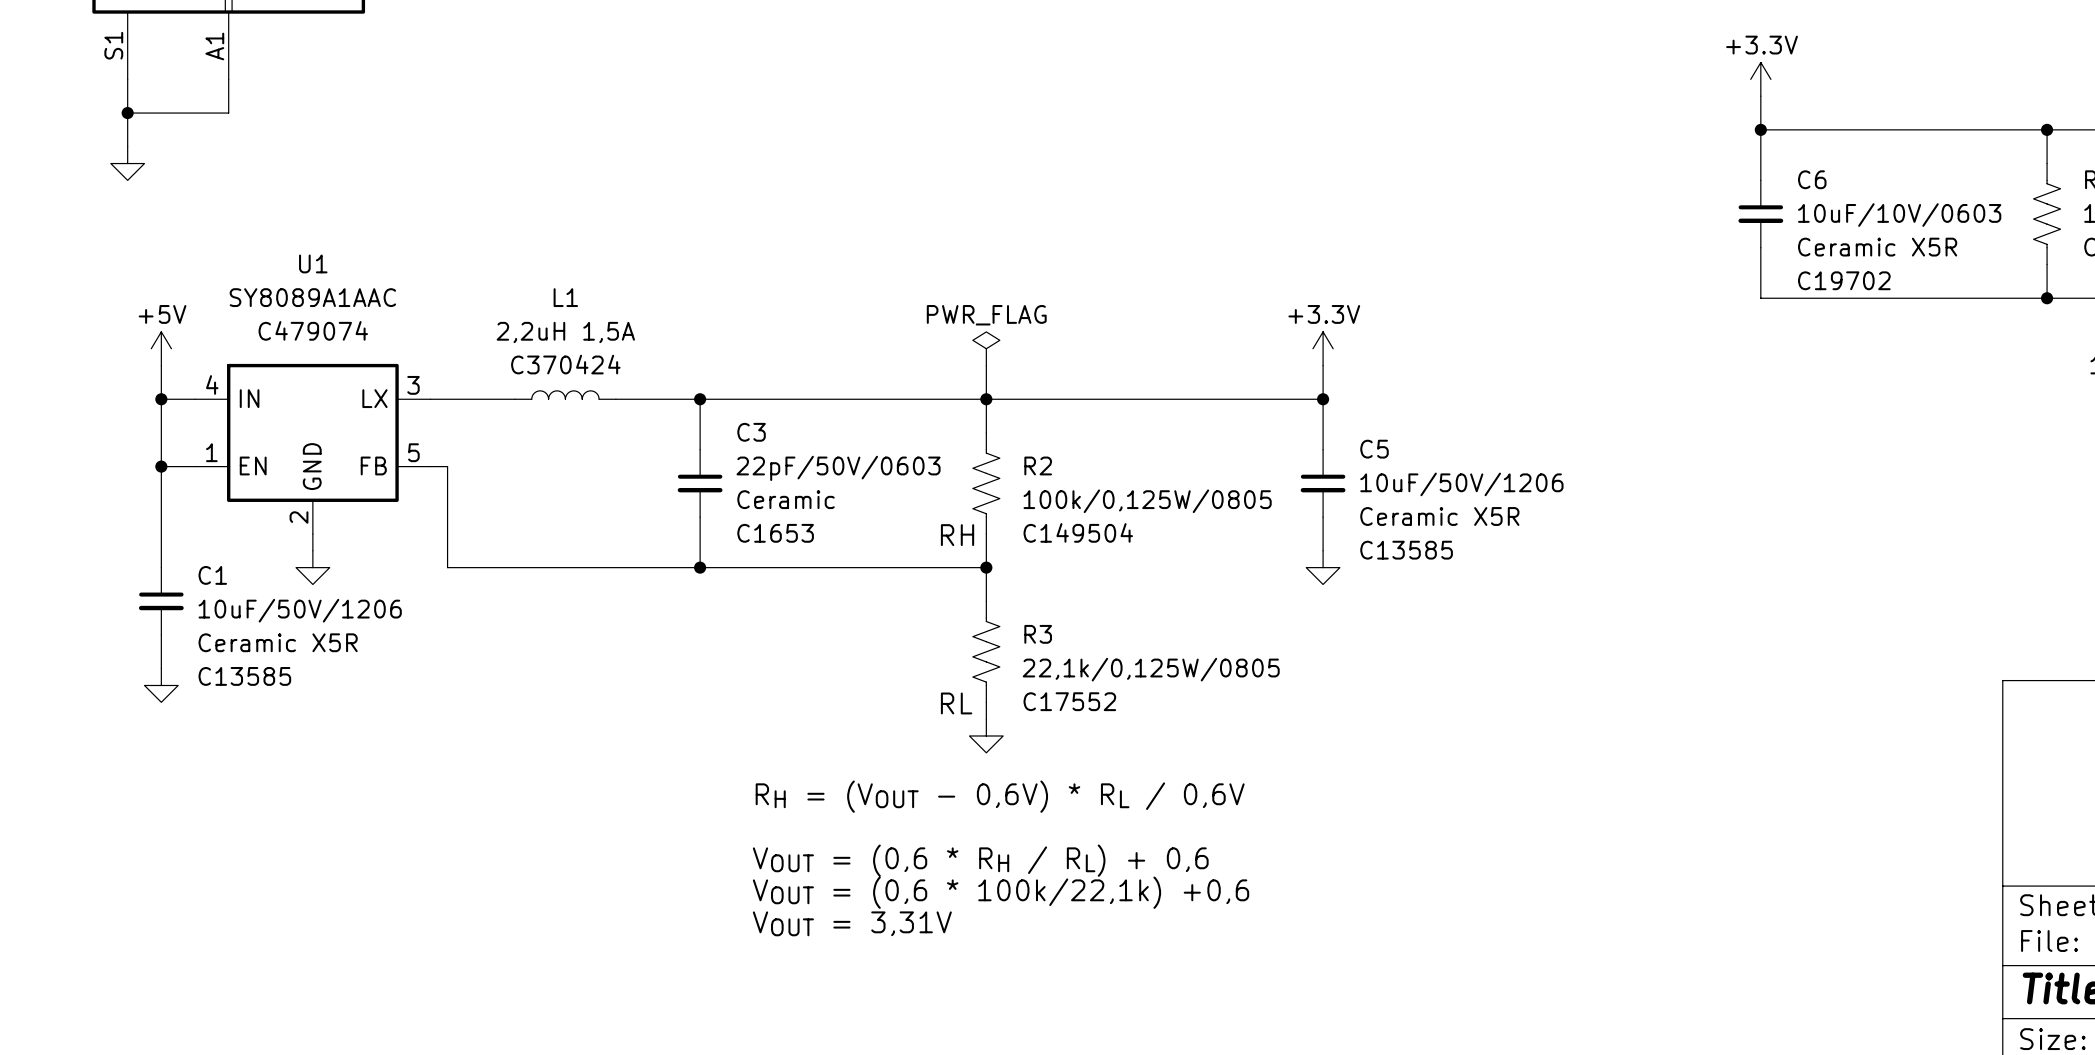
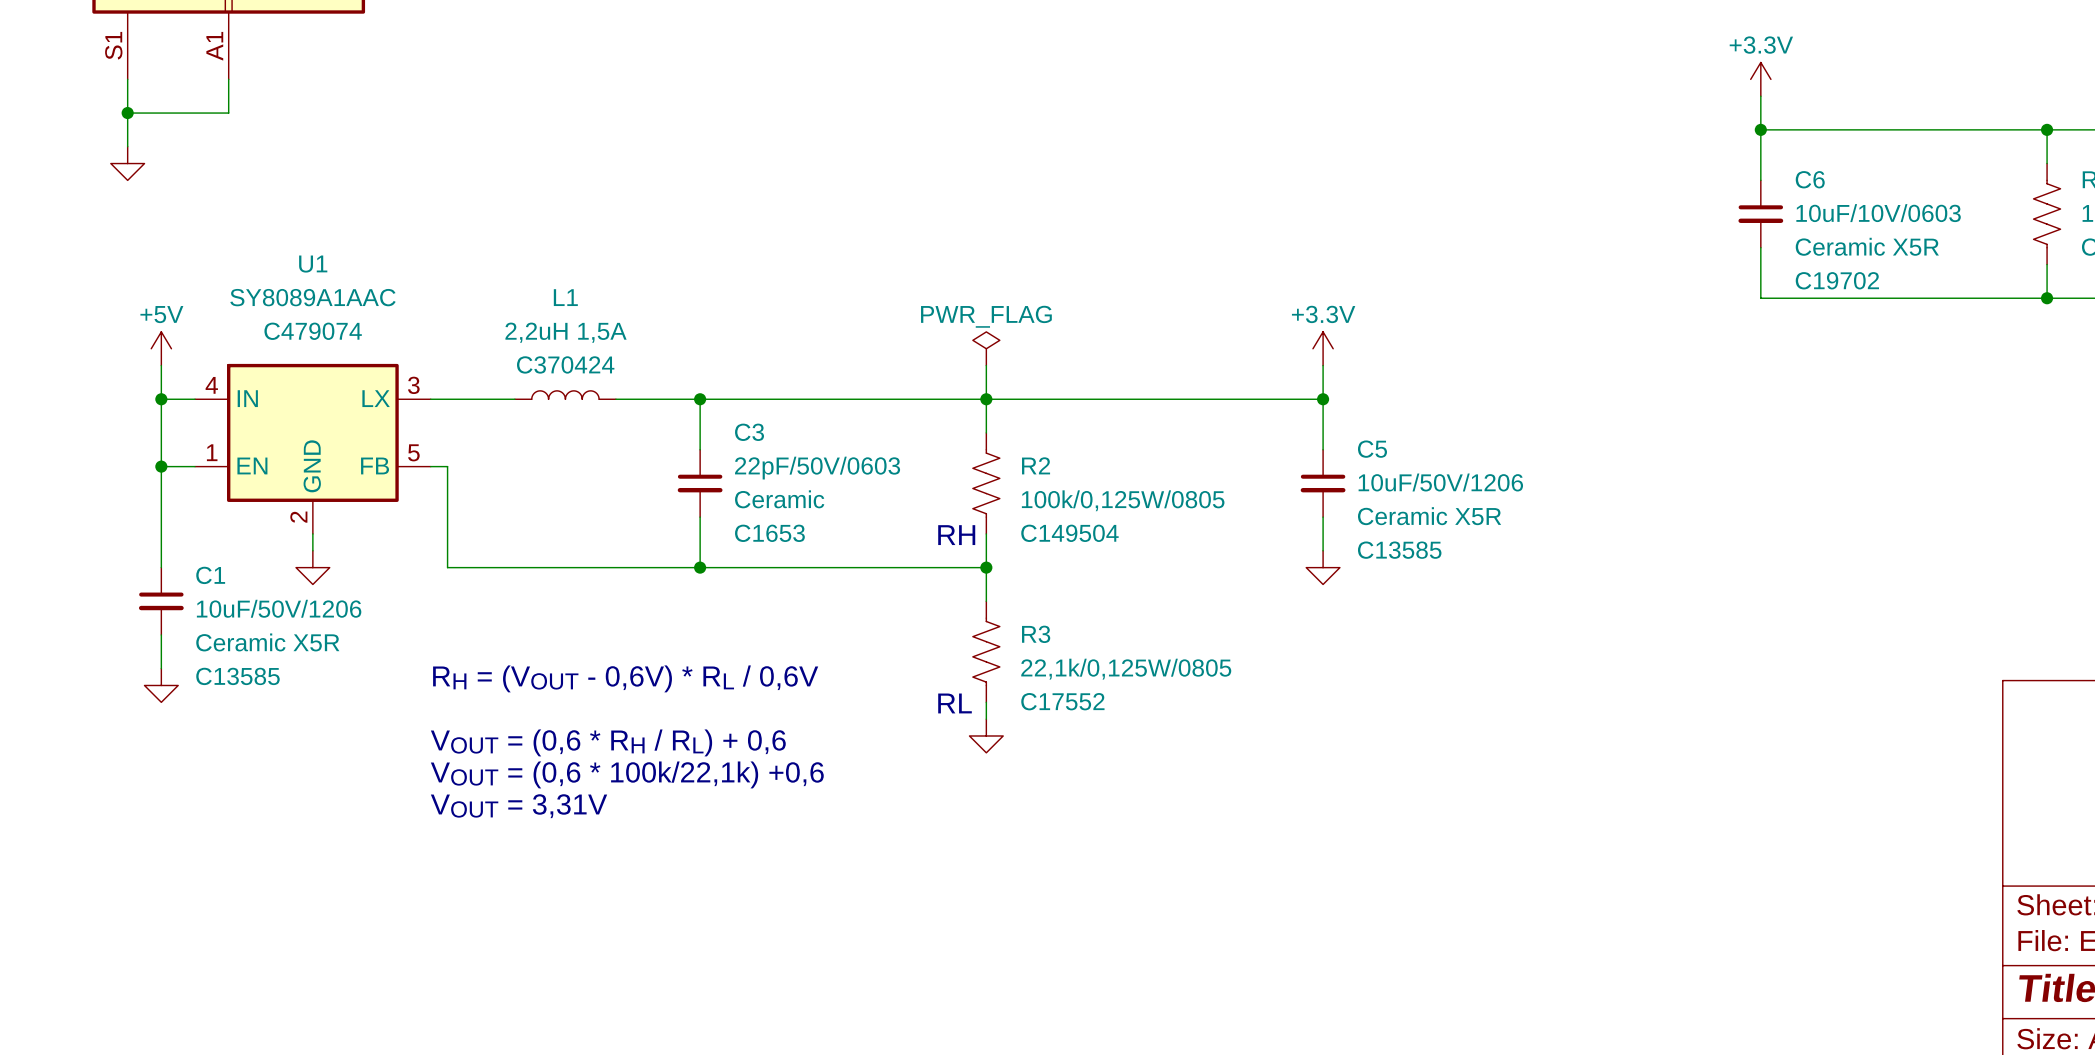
text: none -> RH = (VOUT - 0,6V) * RL / 0,6V (625, 678)
text: none -> VOUT = (0,6 * RH / RL) + 0,6 (608, 742)
text: none -> VOUT = (0,6 * 100k/22,1k) +0,6 (627, 774)
text: RH = (VOUT - 0,6V) * RL / 0,6V (1000, 796) -> none
text: none -> VOUT = 3,31V (519, 806)
text: VOUT = (0,6 * RH / RL) + 0,6 (980, 860) -> none
text: VOUT = (0,6 * 100k/22,1k) +0,6 (1001, 892) -> none
text: VOUT = 3,31V (852, 923) -> none

